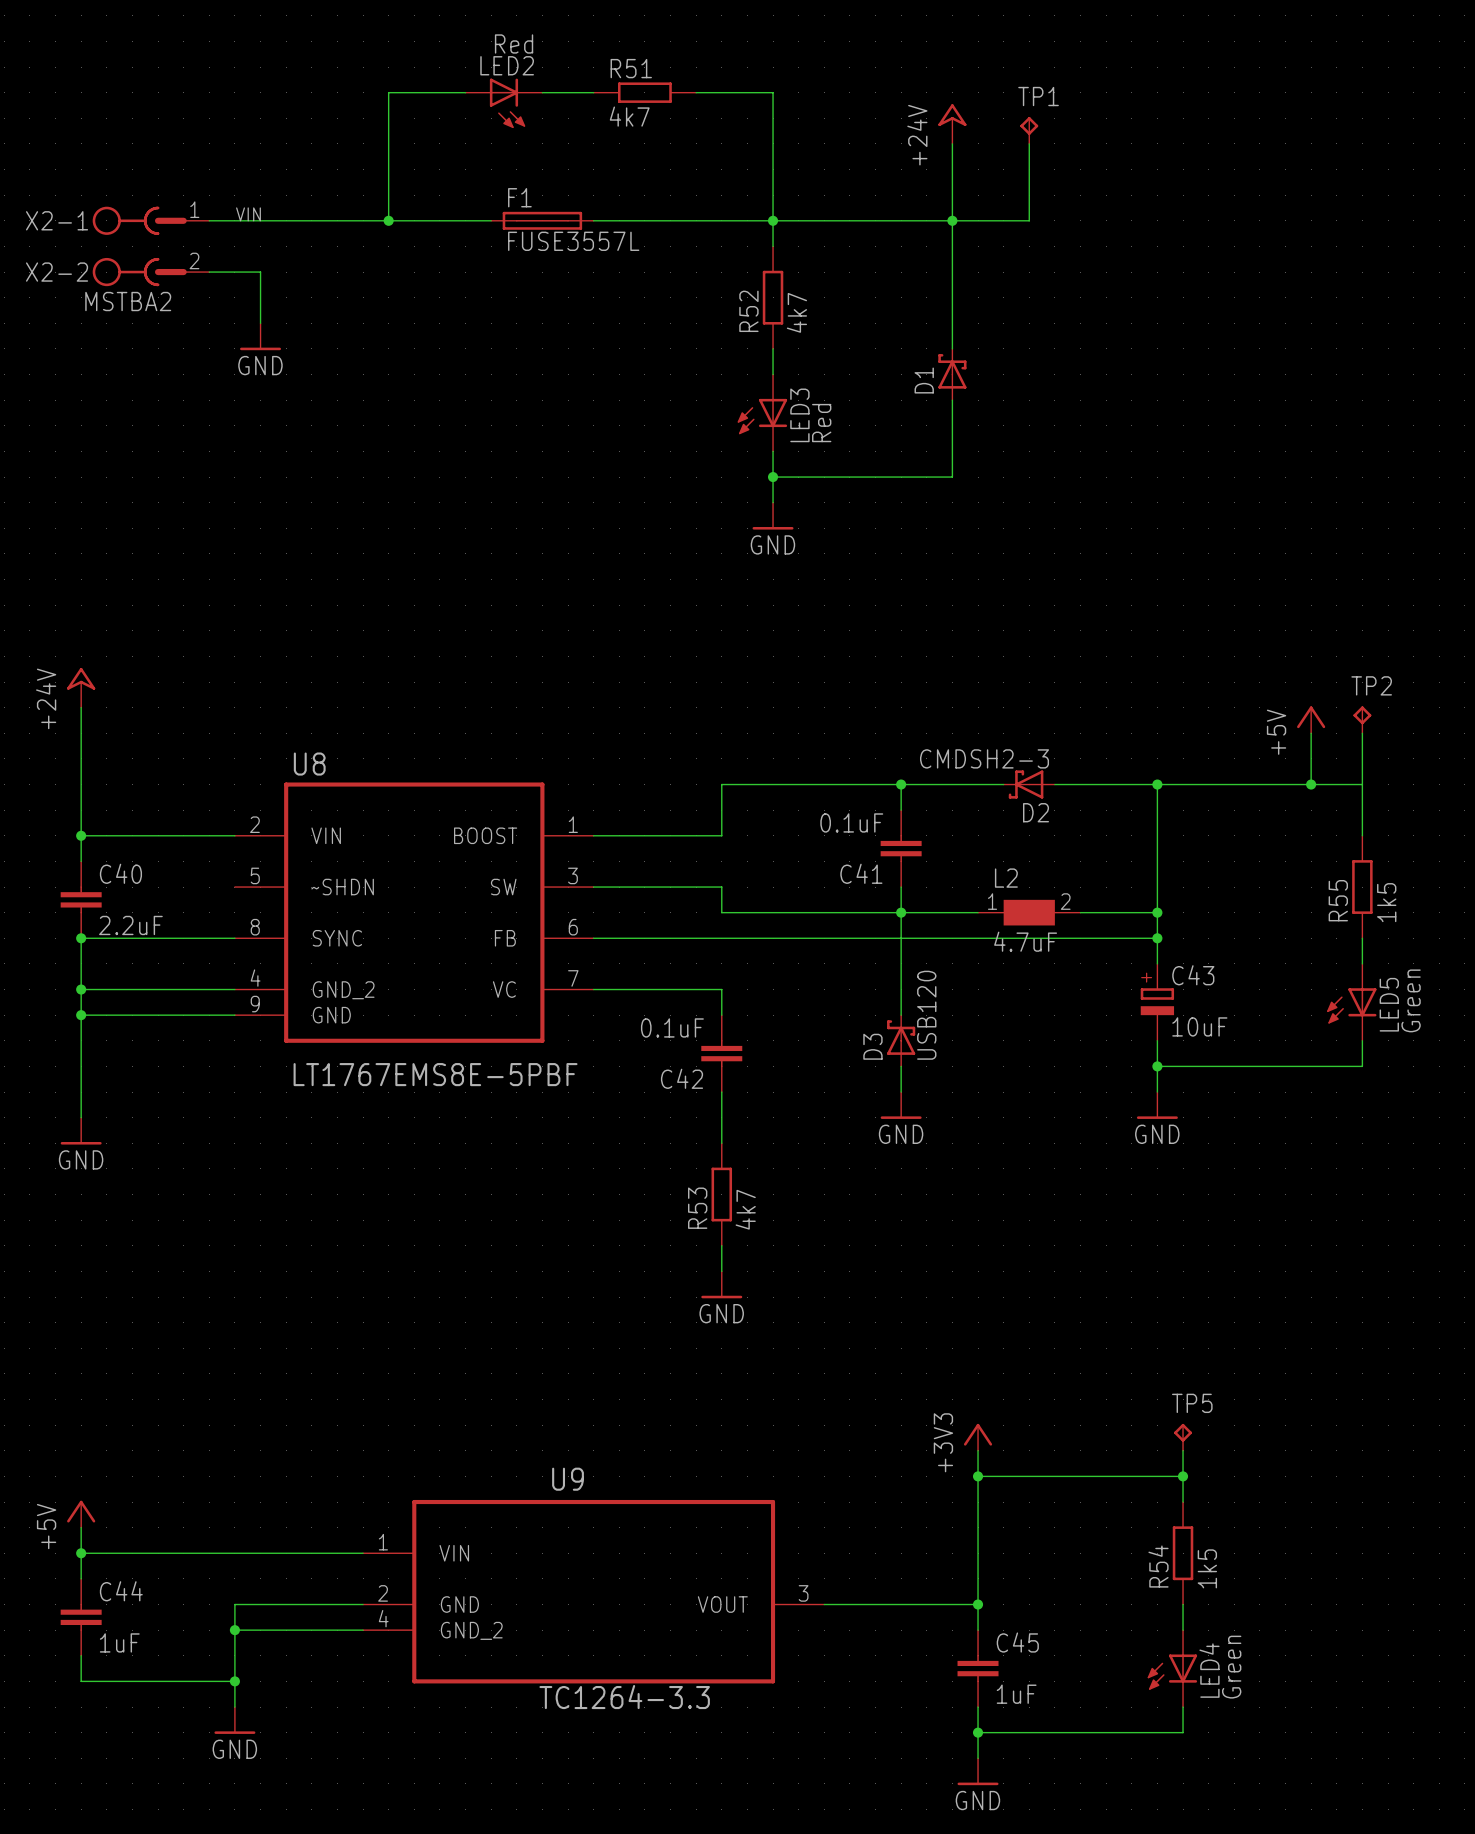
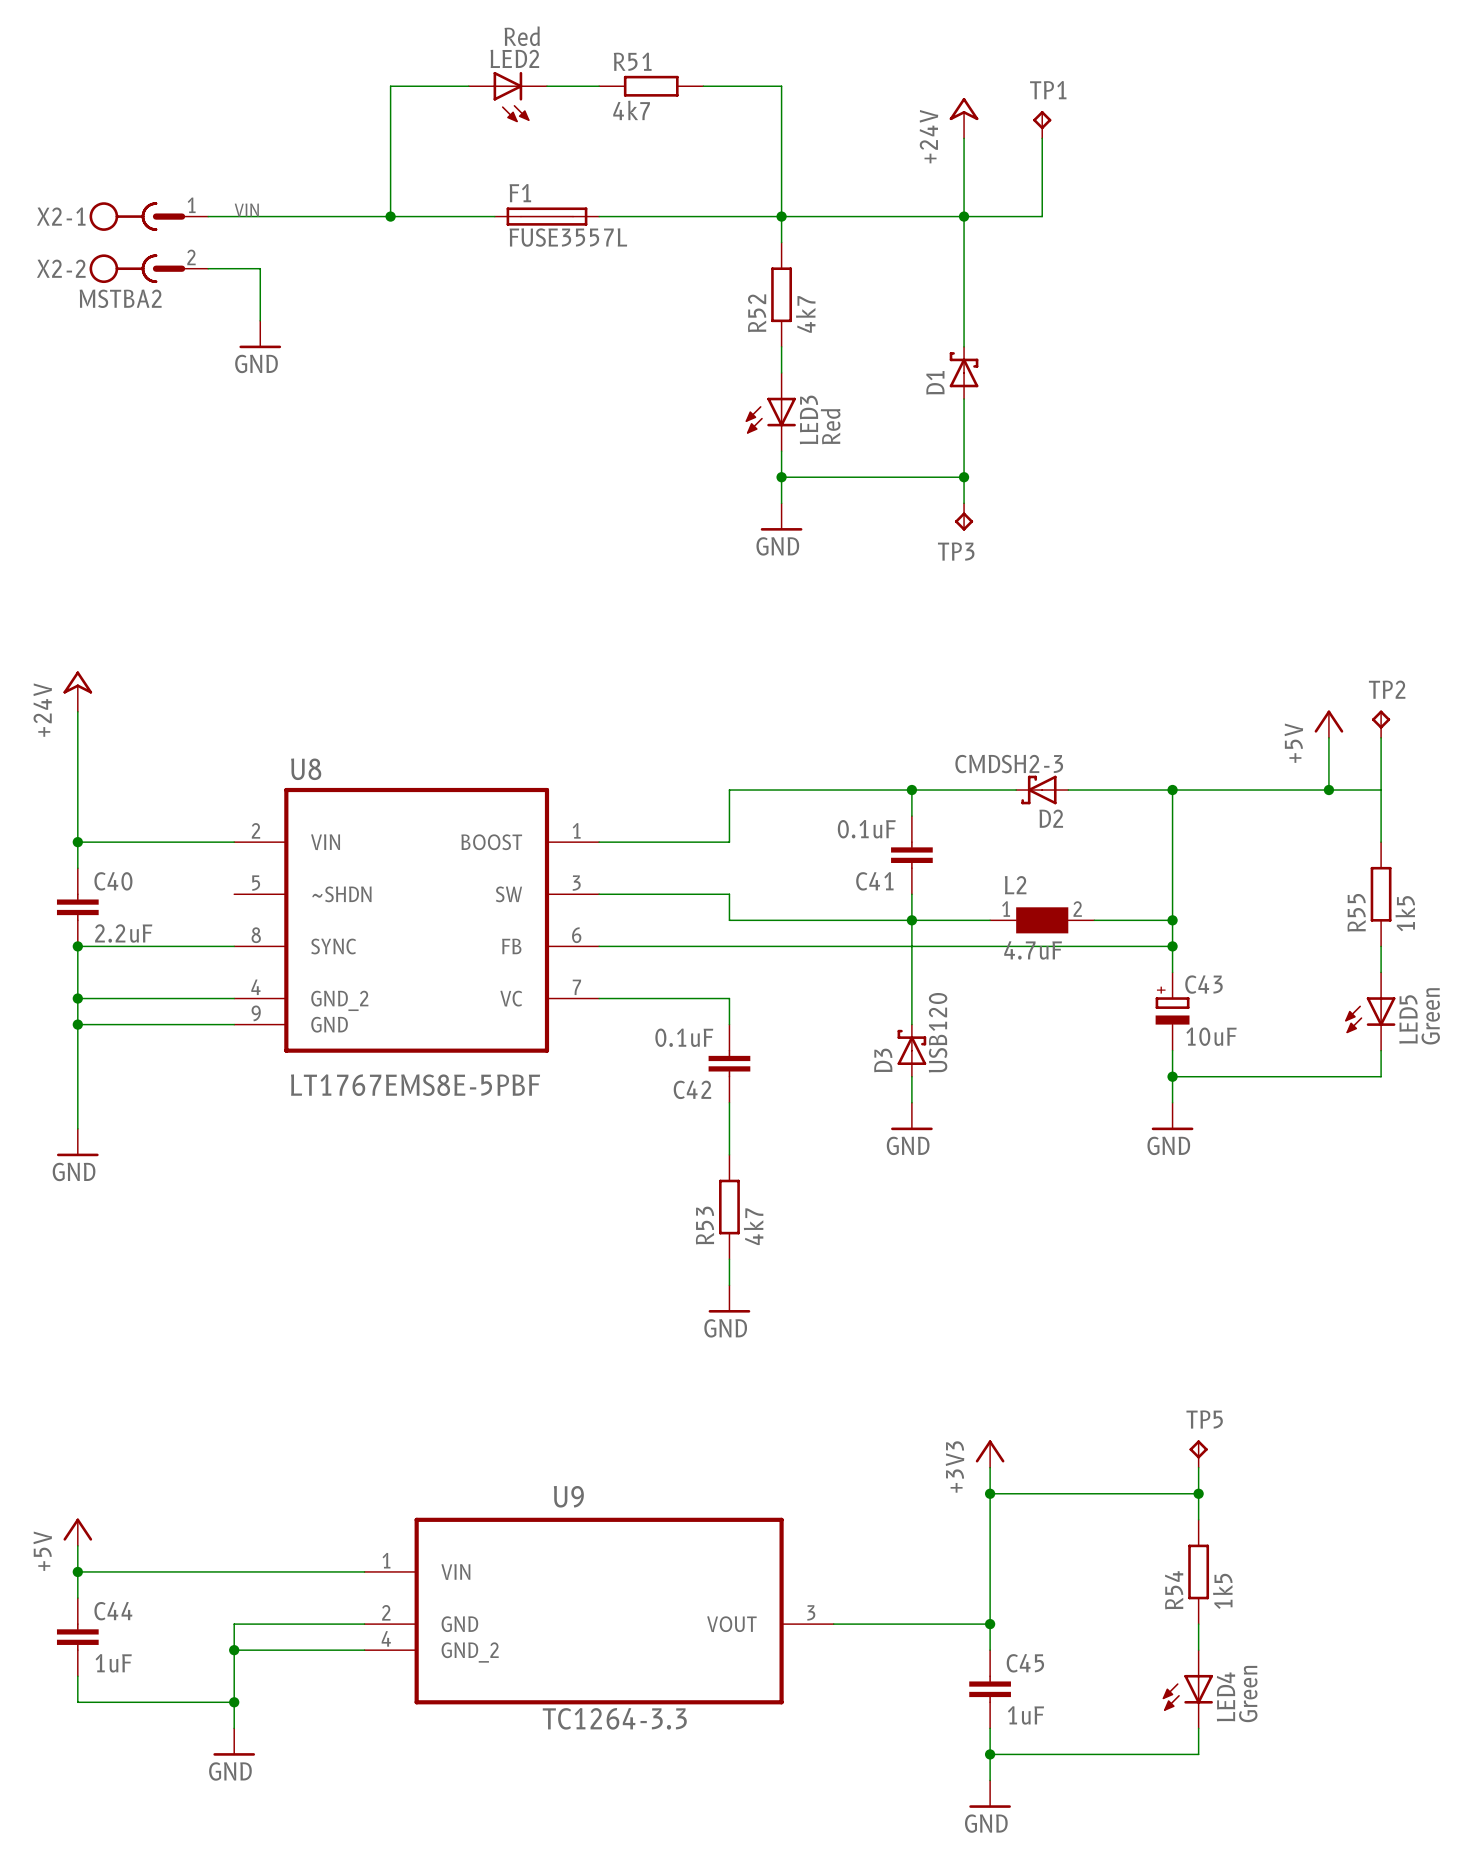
wire: none -> (964, 477) (964, 503)
junction: none -> (964, 477)
TP3: none -> (964, 516)

